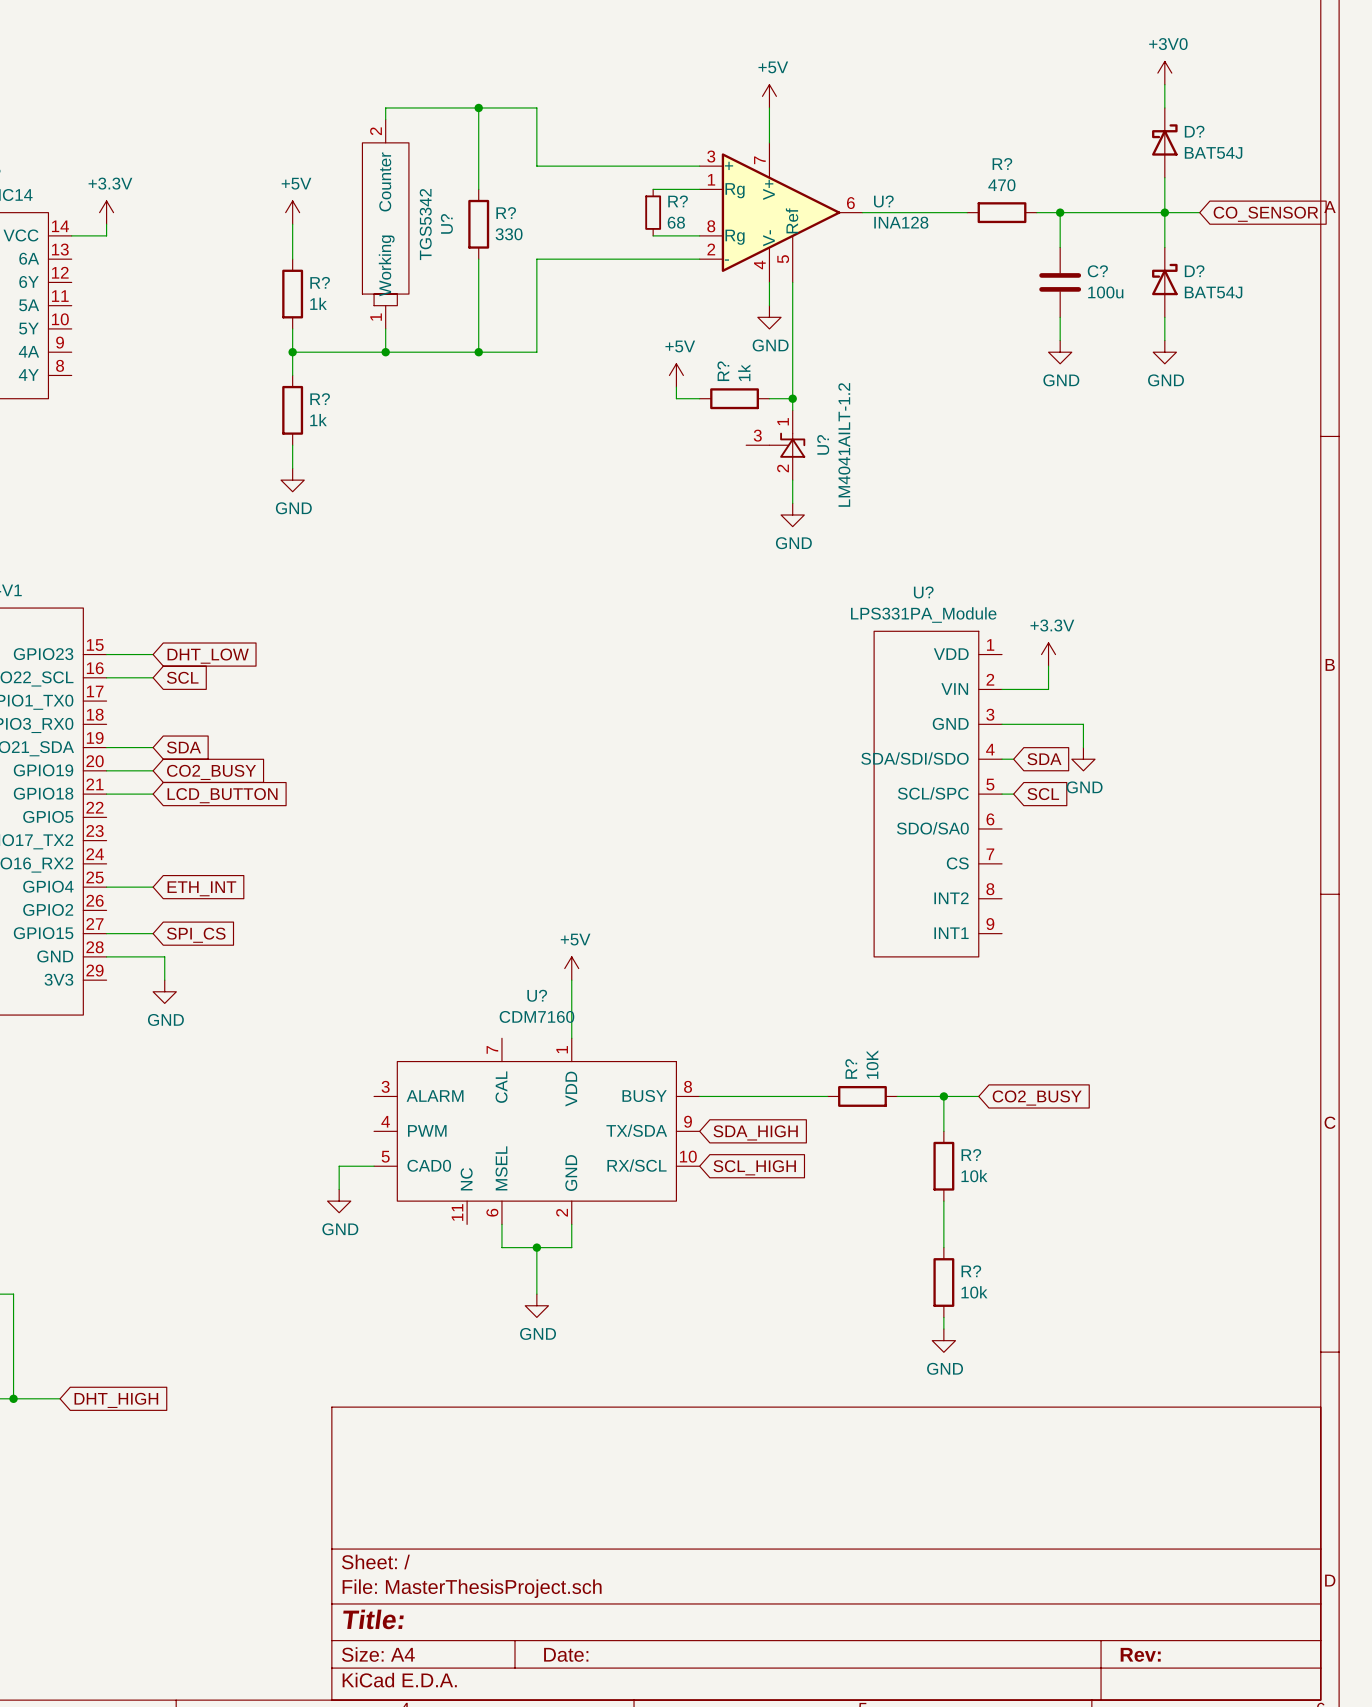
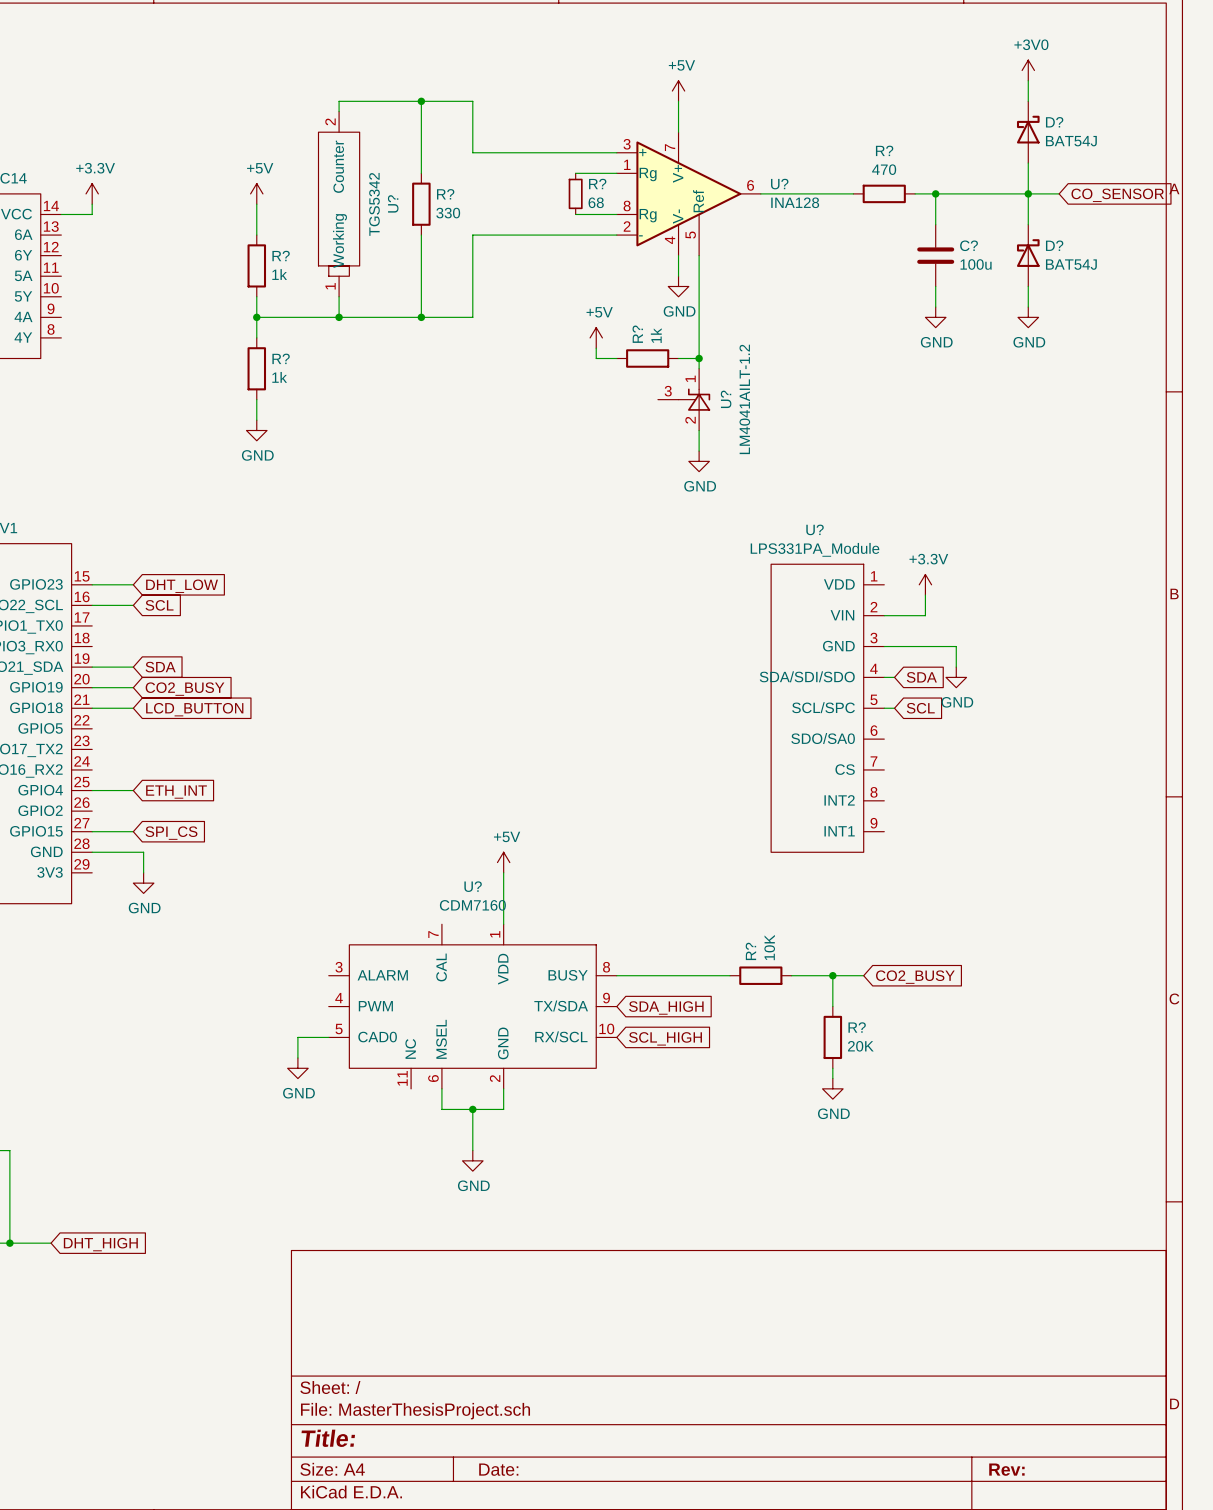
R? value: 10k (974, 1176) -> 20K (860, 1046)
wire: (943, 1212) (943, 1247) -> none
R?: 10k (943, 1282) -> none
wire: (943, 1317) (943, 1329) -> none
power symbol position: GND (943, 1340) -> GND (832, 1088)

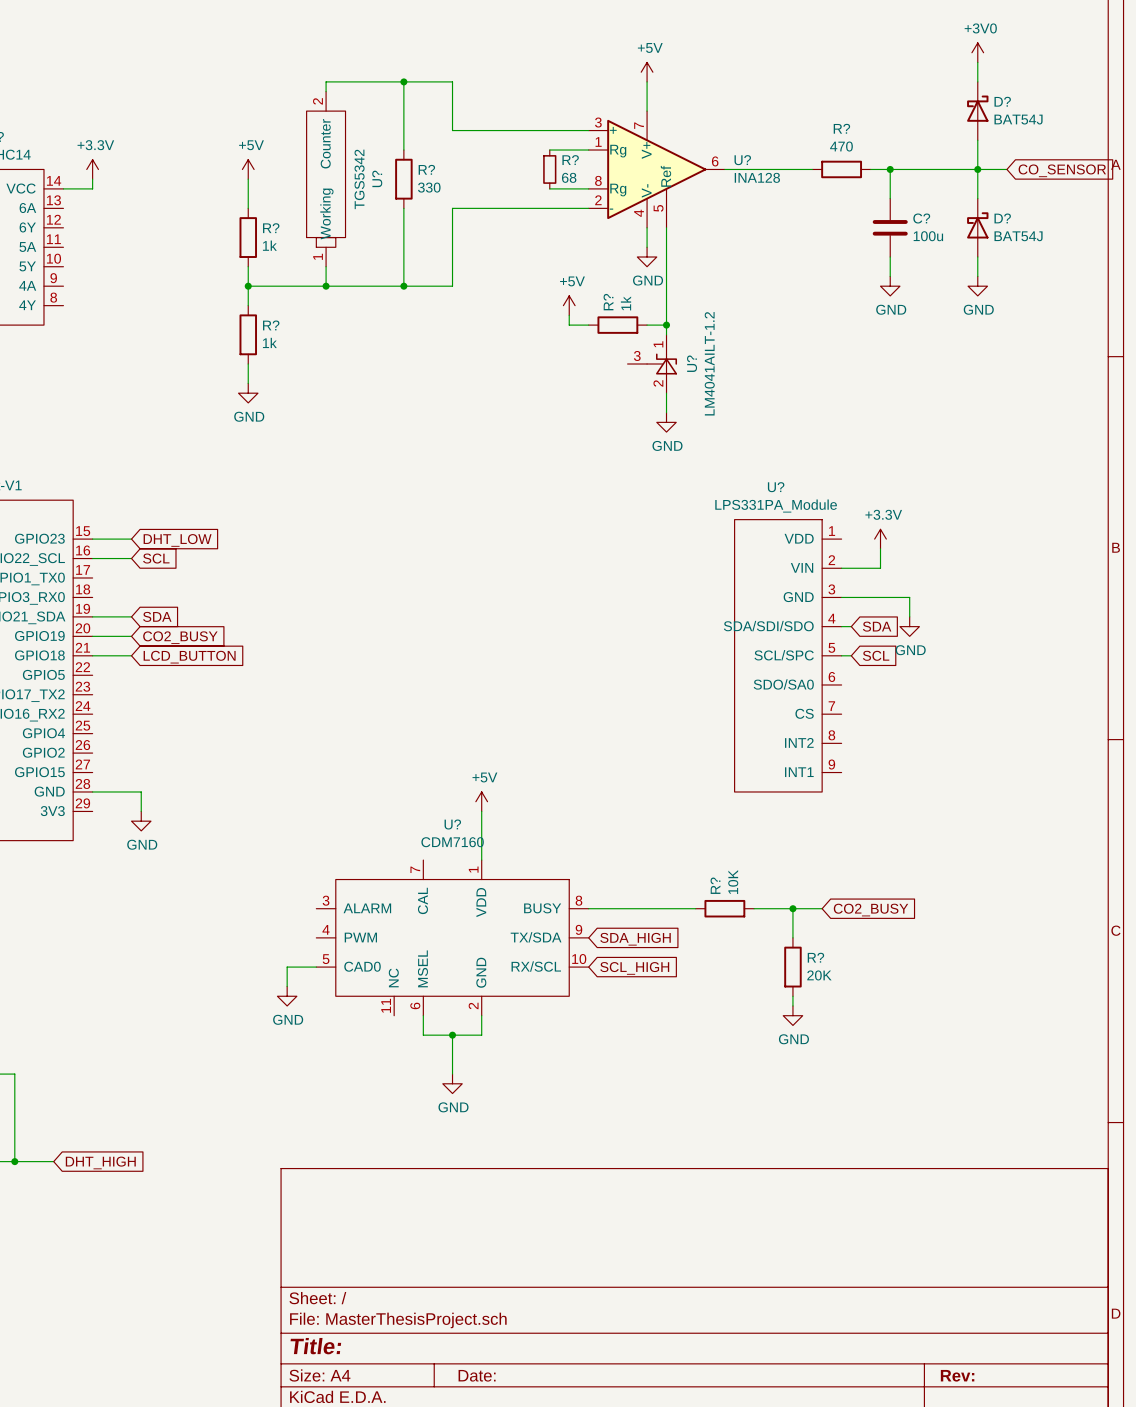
wire: (92, 790) (133, 790) -> none
global label: ETH_INT (176, 792) -> none
wire: (92, 831) (133, 831) -> none
global label: SPI_CS (171, 833) -> none

